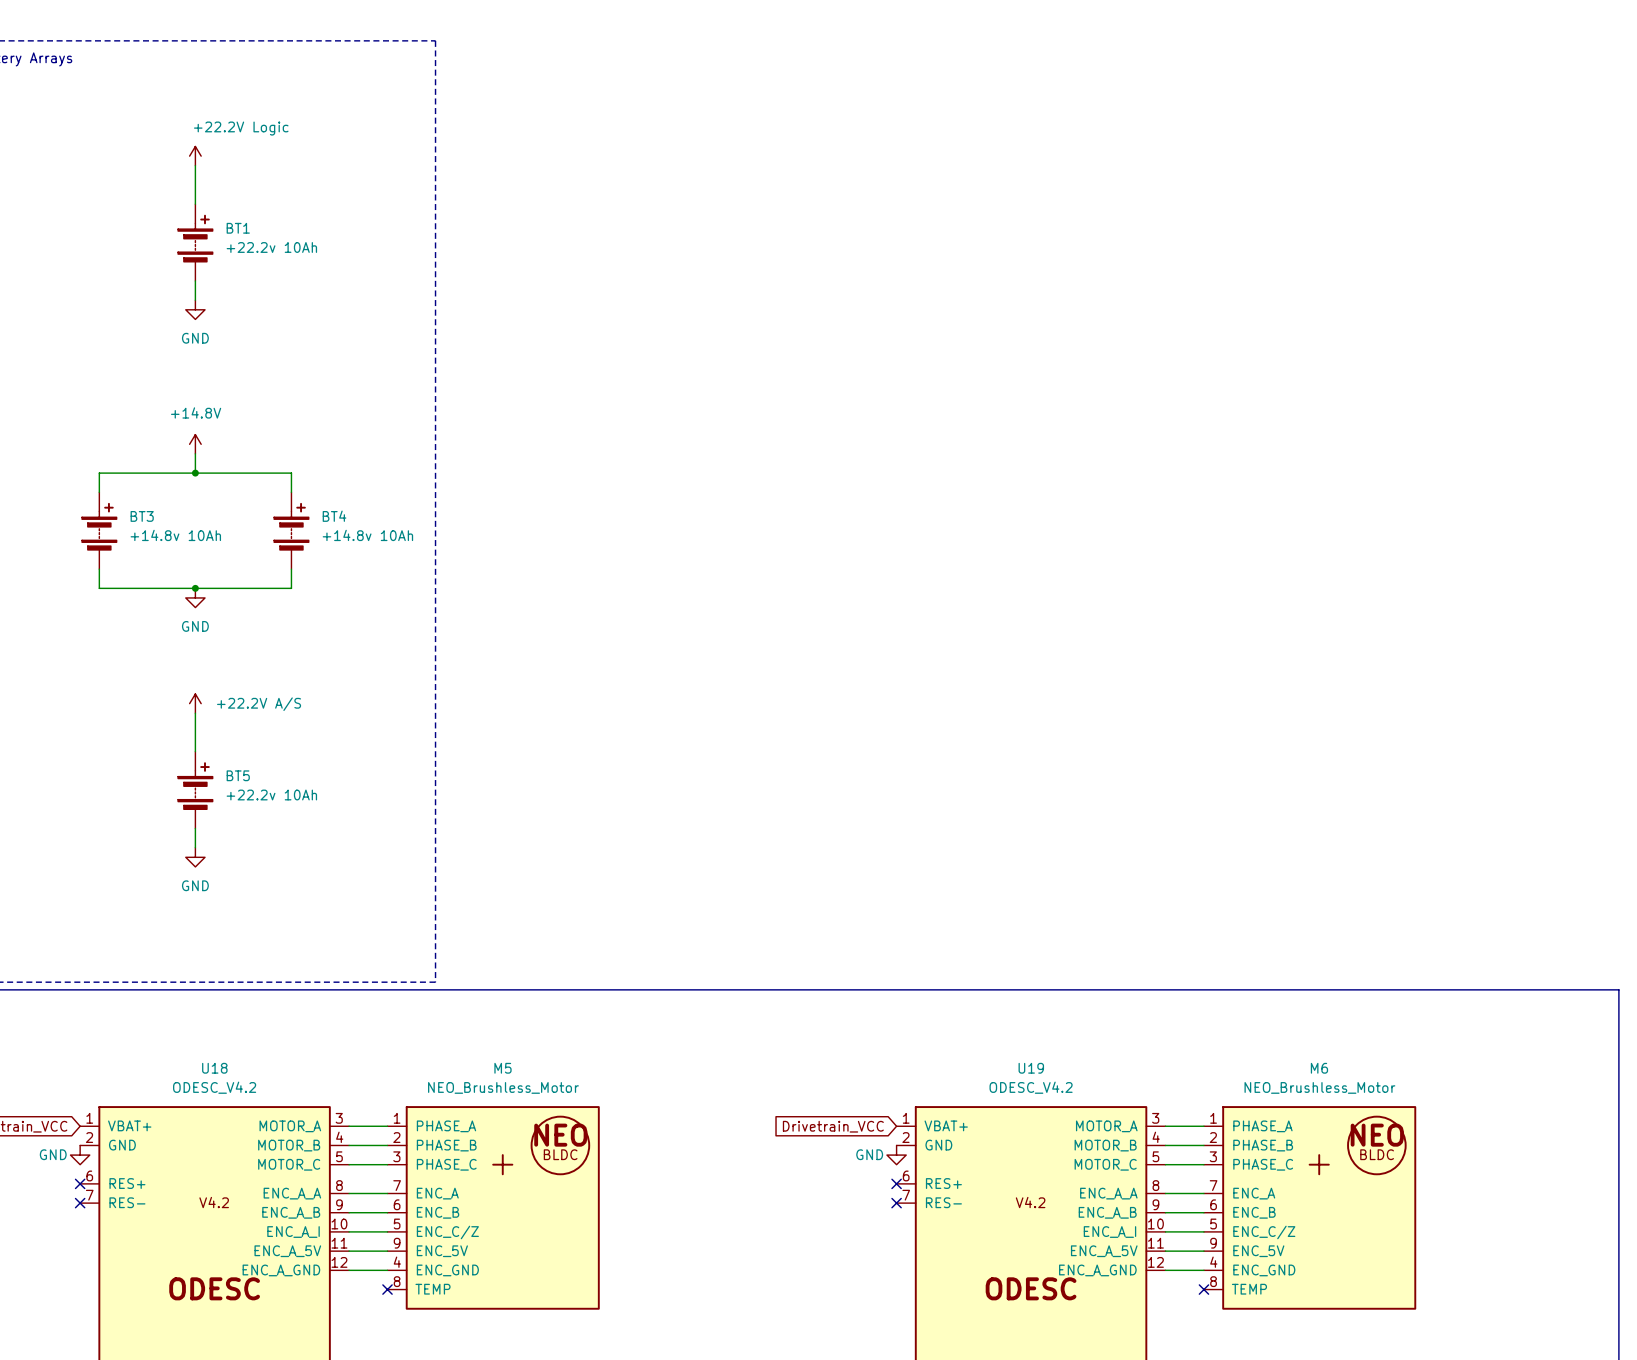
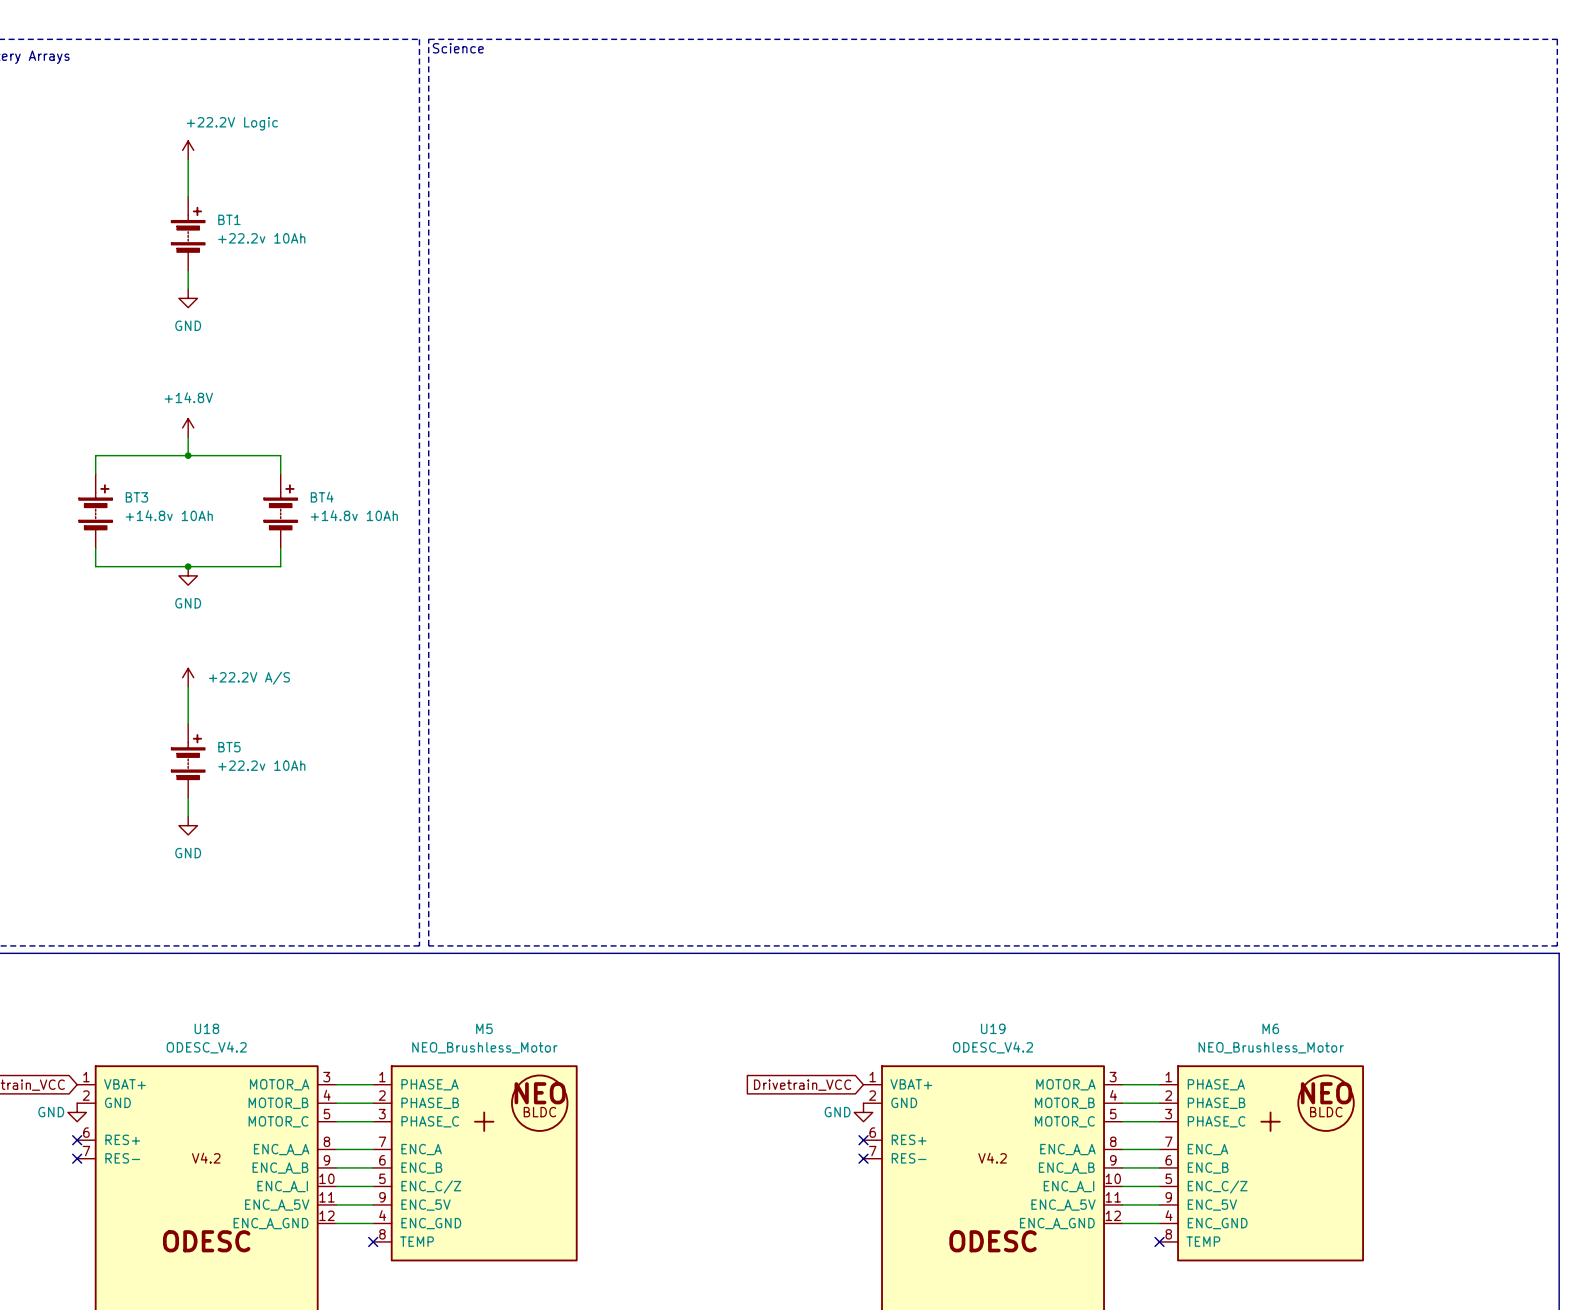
line: none -> (428, 39) (1557, 39) (1557, 945) (428, 945) (428, 39)
text: none -> Science (458, 48)

